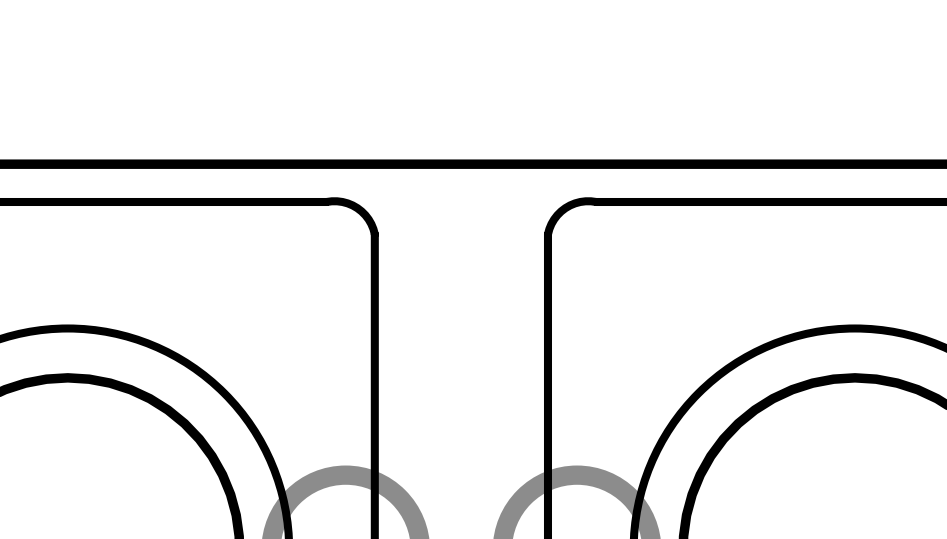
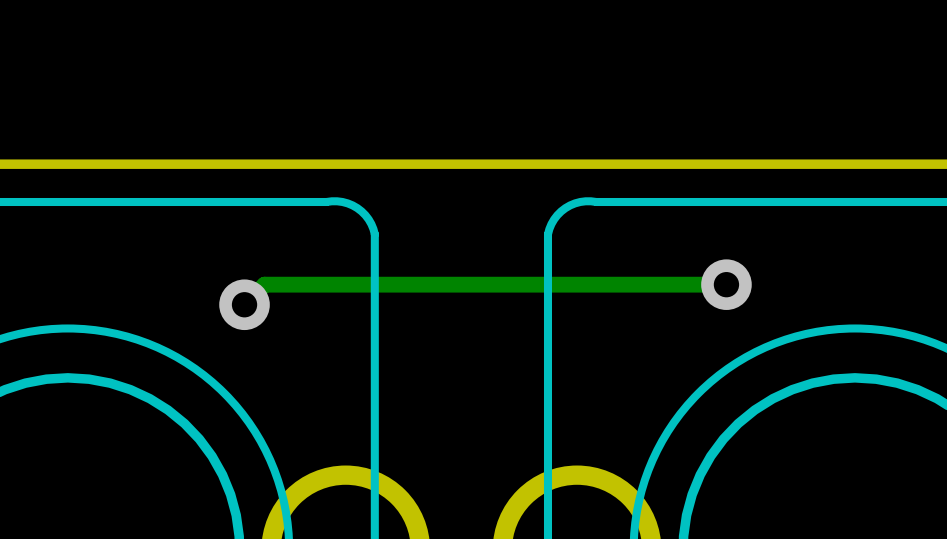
track: none -> (726, 284) (264, 284) (244, 304)
via: none -> (726, 284)
via: none -> (244, 304)

